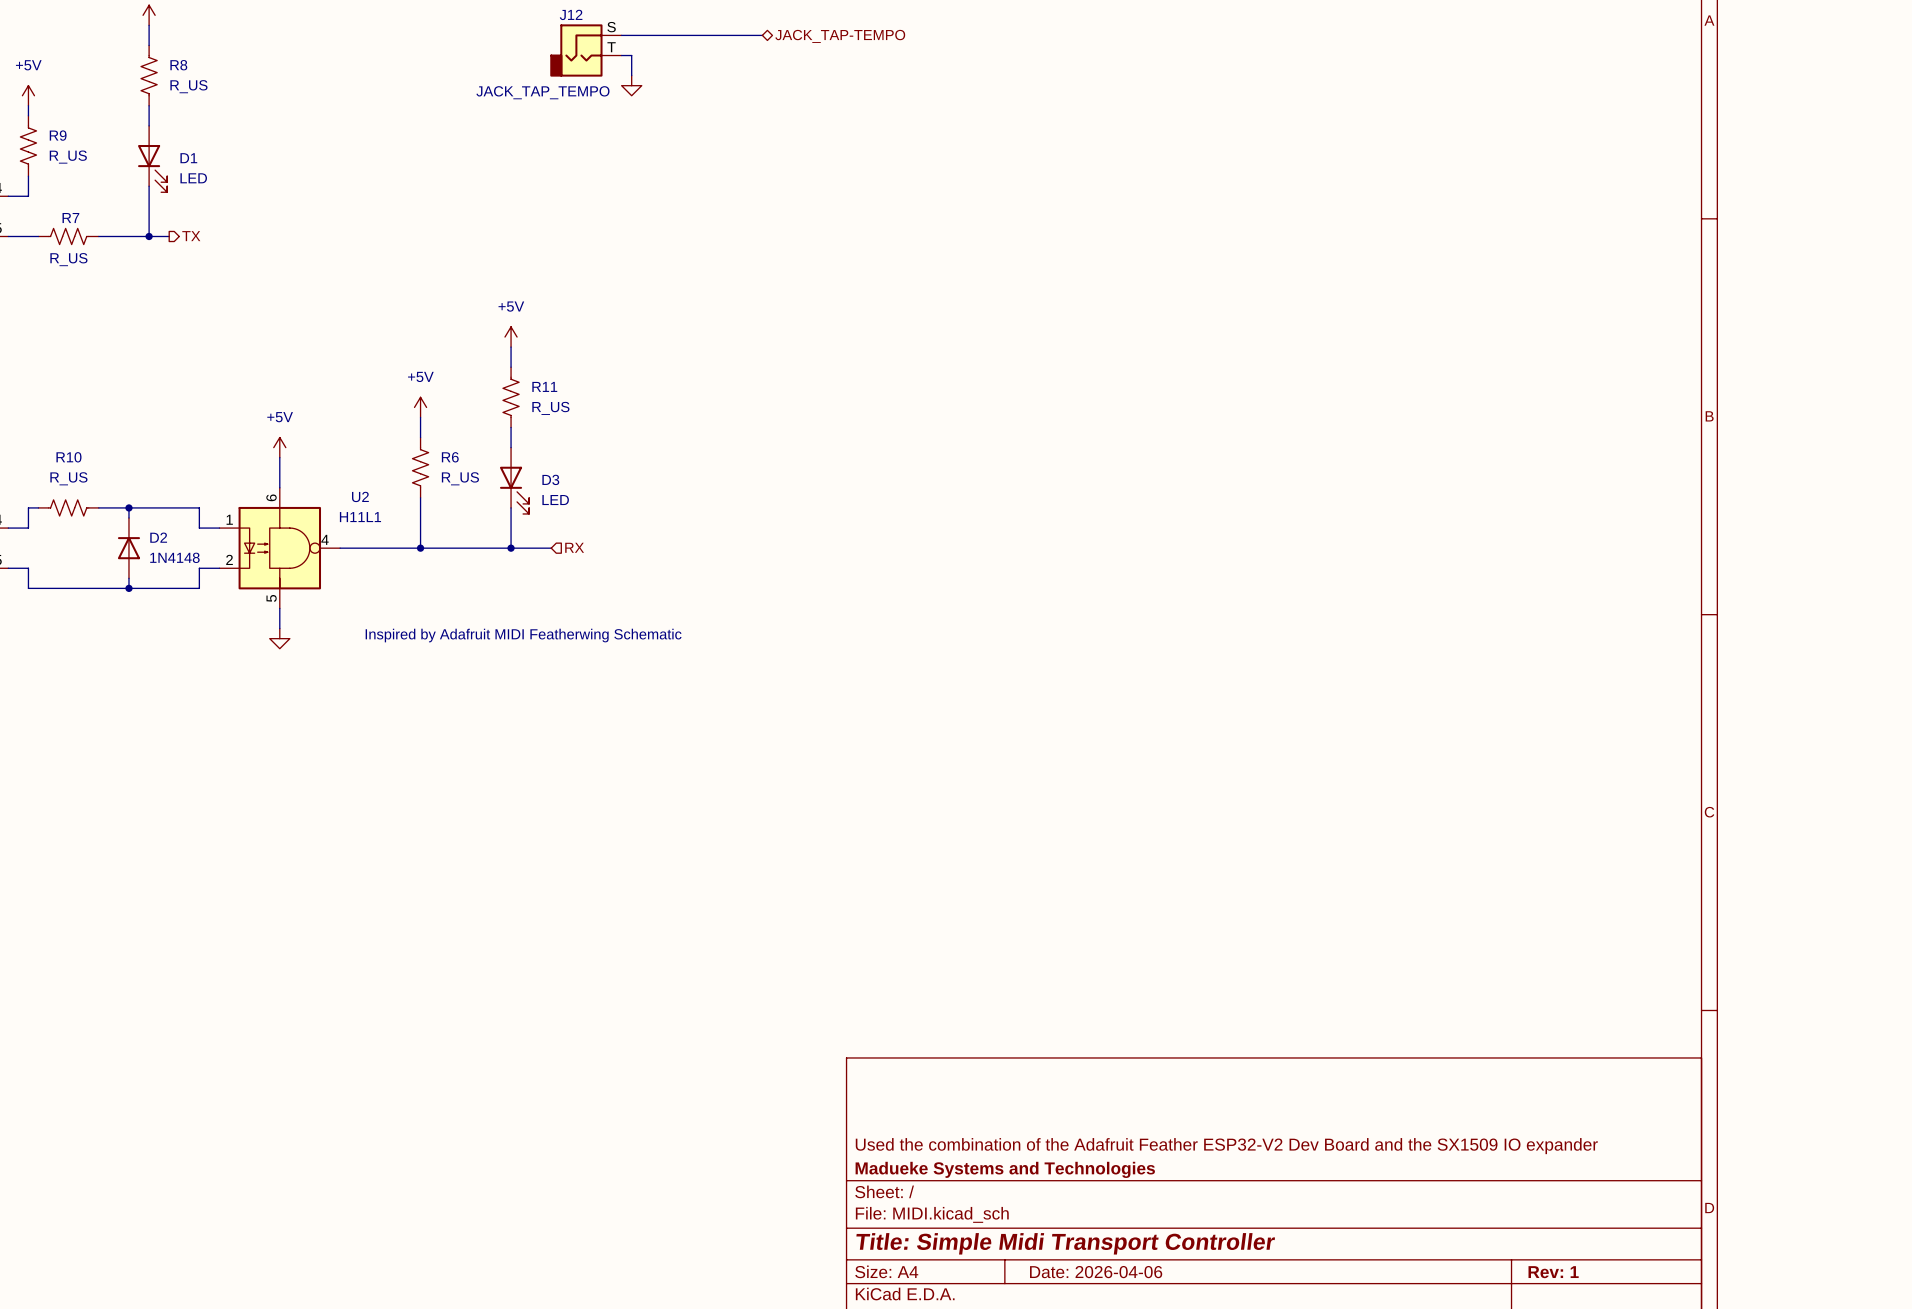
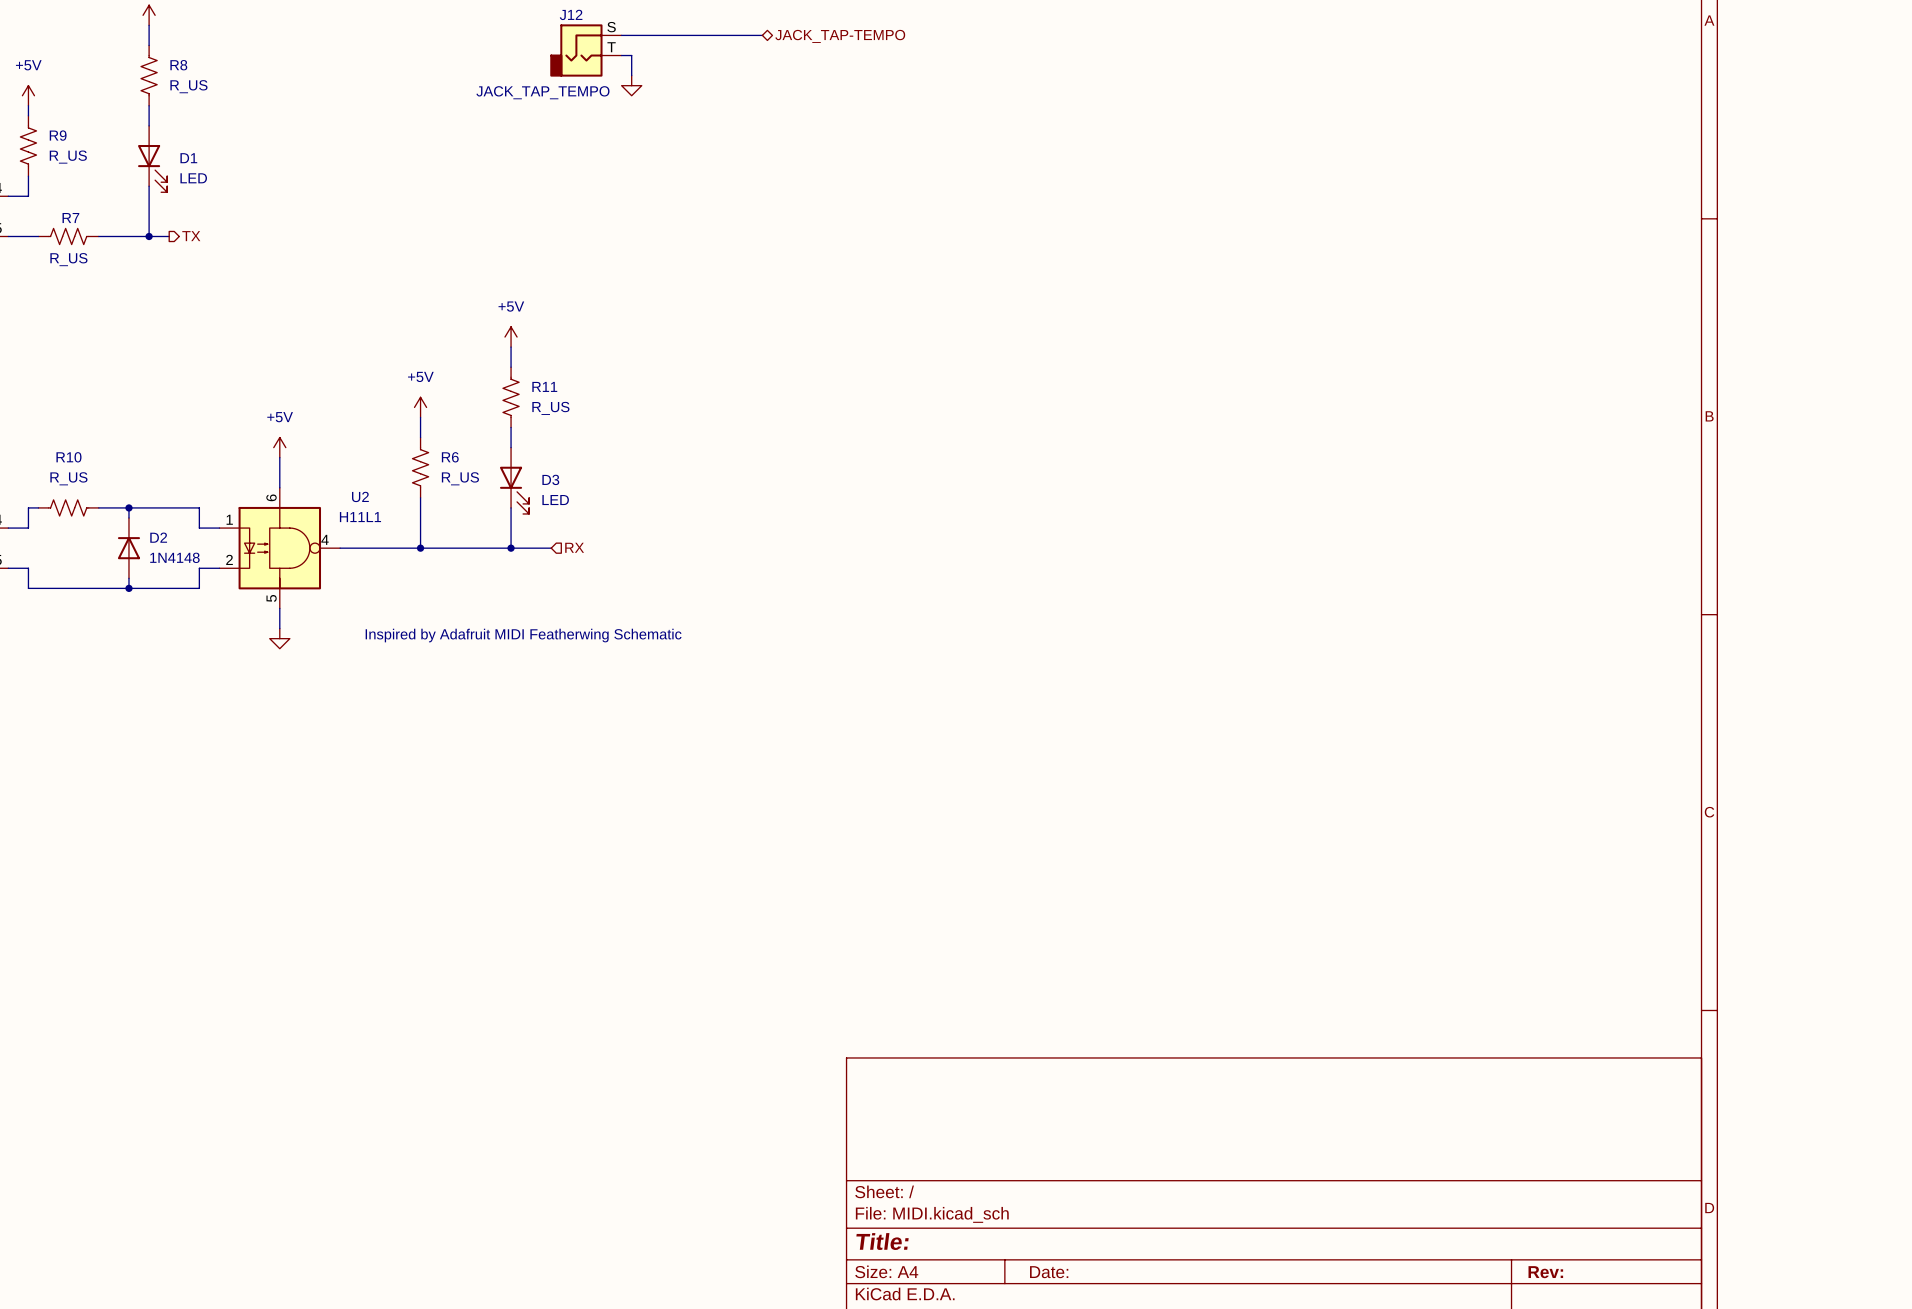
title block: Used the combination of the Adafruit Feather ESP32-V2 Dev Board and the SX1509 IO expander (1226, 1146) -> none
title block: Madueke Systems and Technologies (1005, 1169) -> none
title block: Title: Simple Midi Transport Controller (1065, 1243) -> Title: (882, 1241)
title block: Date: 2026-04-06 (1096, 1272) -> Date: (1049, 1272)
title block: Rev: 1 (1553, 1272) -> Rev: (1545, 1272)

